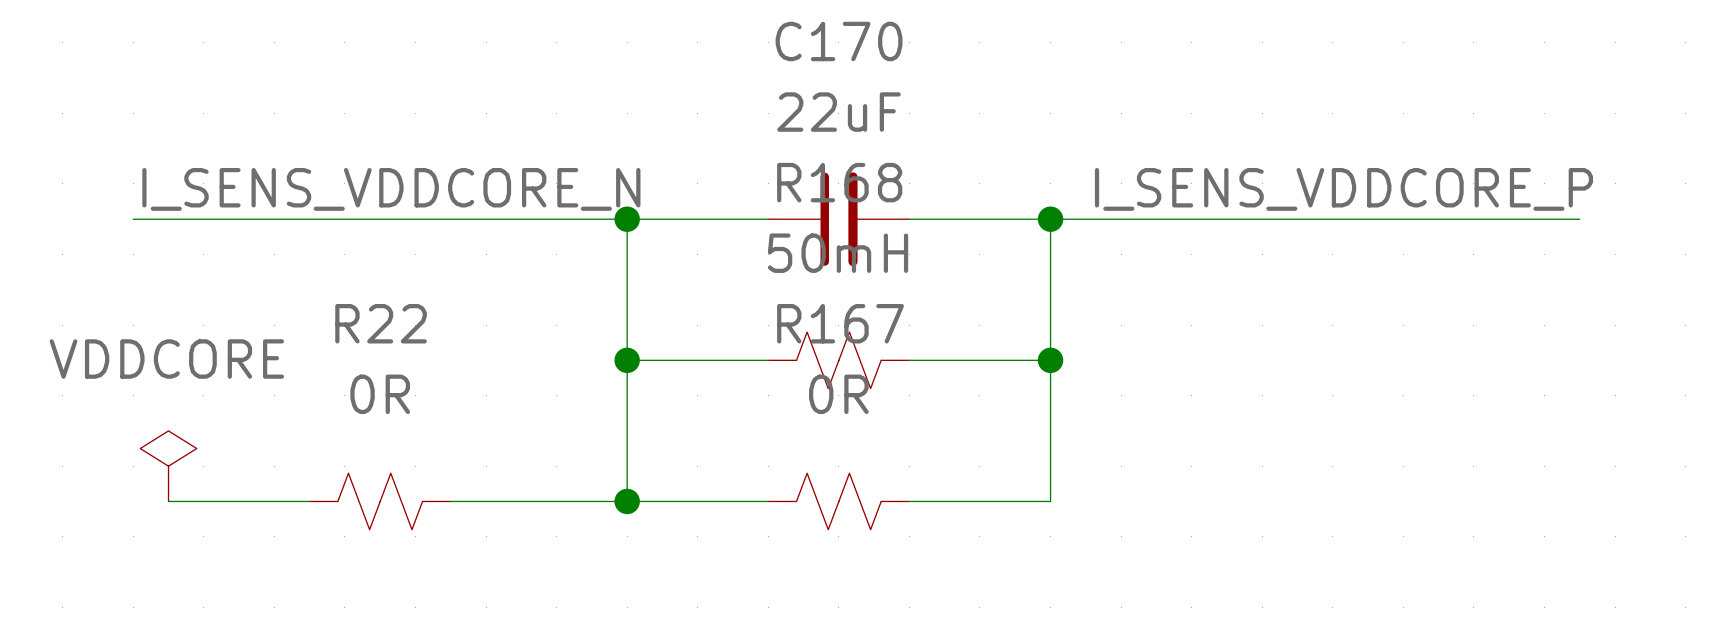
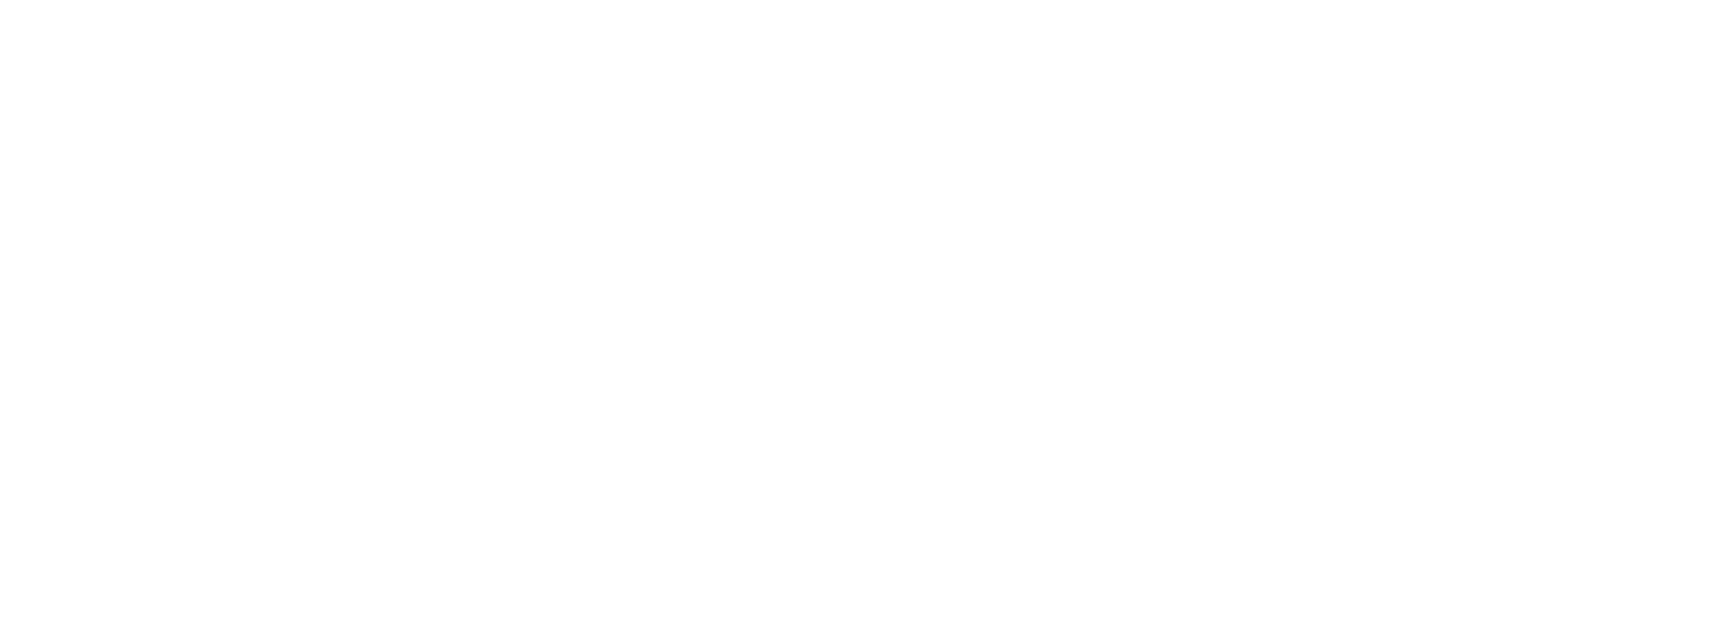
label: I_SENS_VDDCORE_N (391, 189) -> none
label: I_SENS_VDDCORE_P (1343, 189) -> none
wire: (133, 219) (768, 219) -> none
wire: (627, 219) (627, 501) -> none
junction: (627, 219) -> none
C170: 22uF (838, 219) -> none
wire: (909, 219) (1579, 219) -> none
wire: (1050, 219) (1050, 501) (909, 501) -> none
junction: (1050, 219) -> none
wire: (627, 360) (768, 360) -> none
junction: (627, 360) -> none
R168: 50mH (838, 360) -> none
wire: (909, 360) (1050, 360) -> none
junction: (1050, 360) -> none
power symbol: VDDCORE (168, 466) -> none
wire: (168, 501) (309, 501) -> none
R22: 0R (380, 501) -> none
wire: (450, 501) (768, 501) -> none
junction: (627, 501) -> none
R167: 0R (838, 501) -> none

